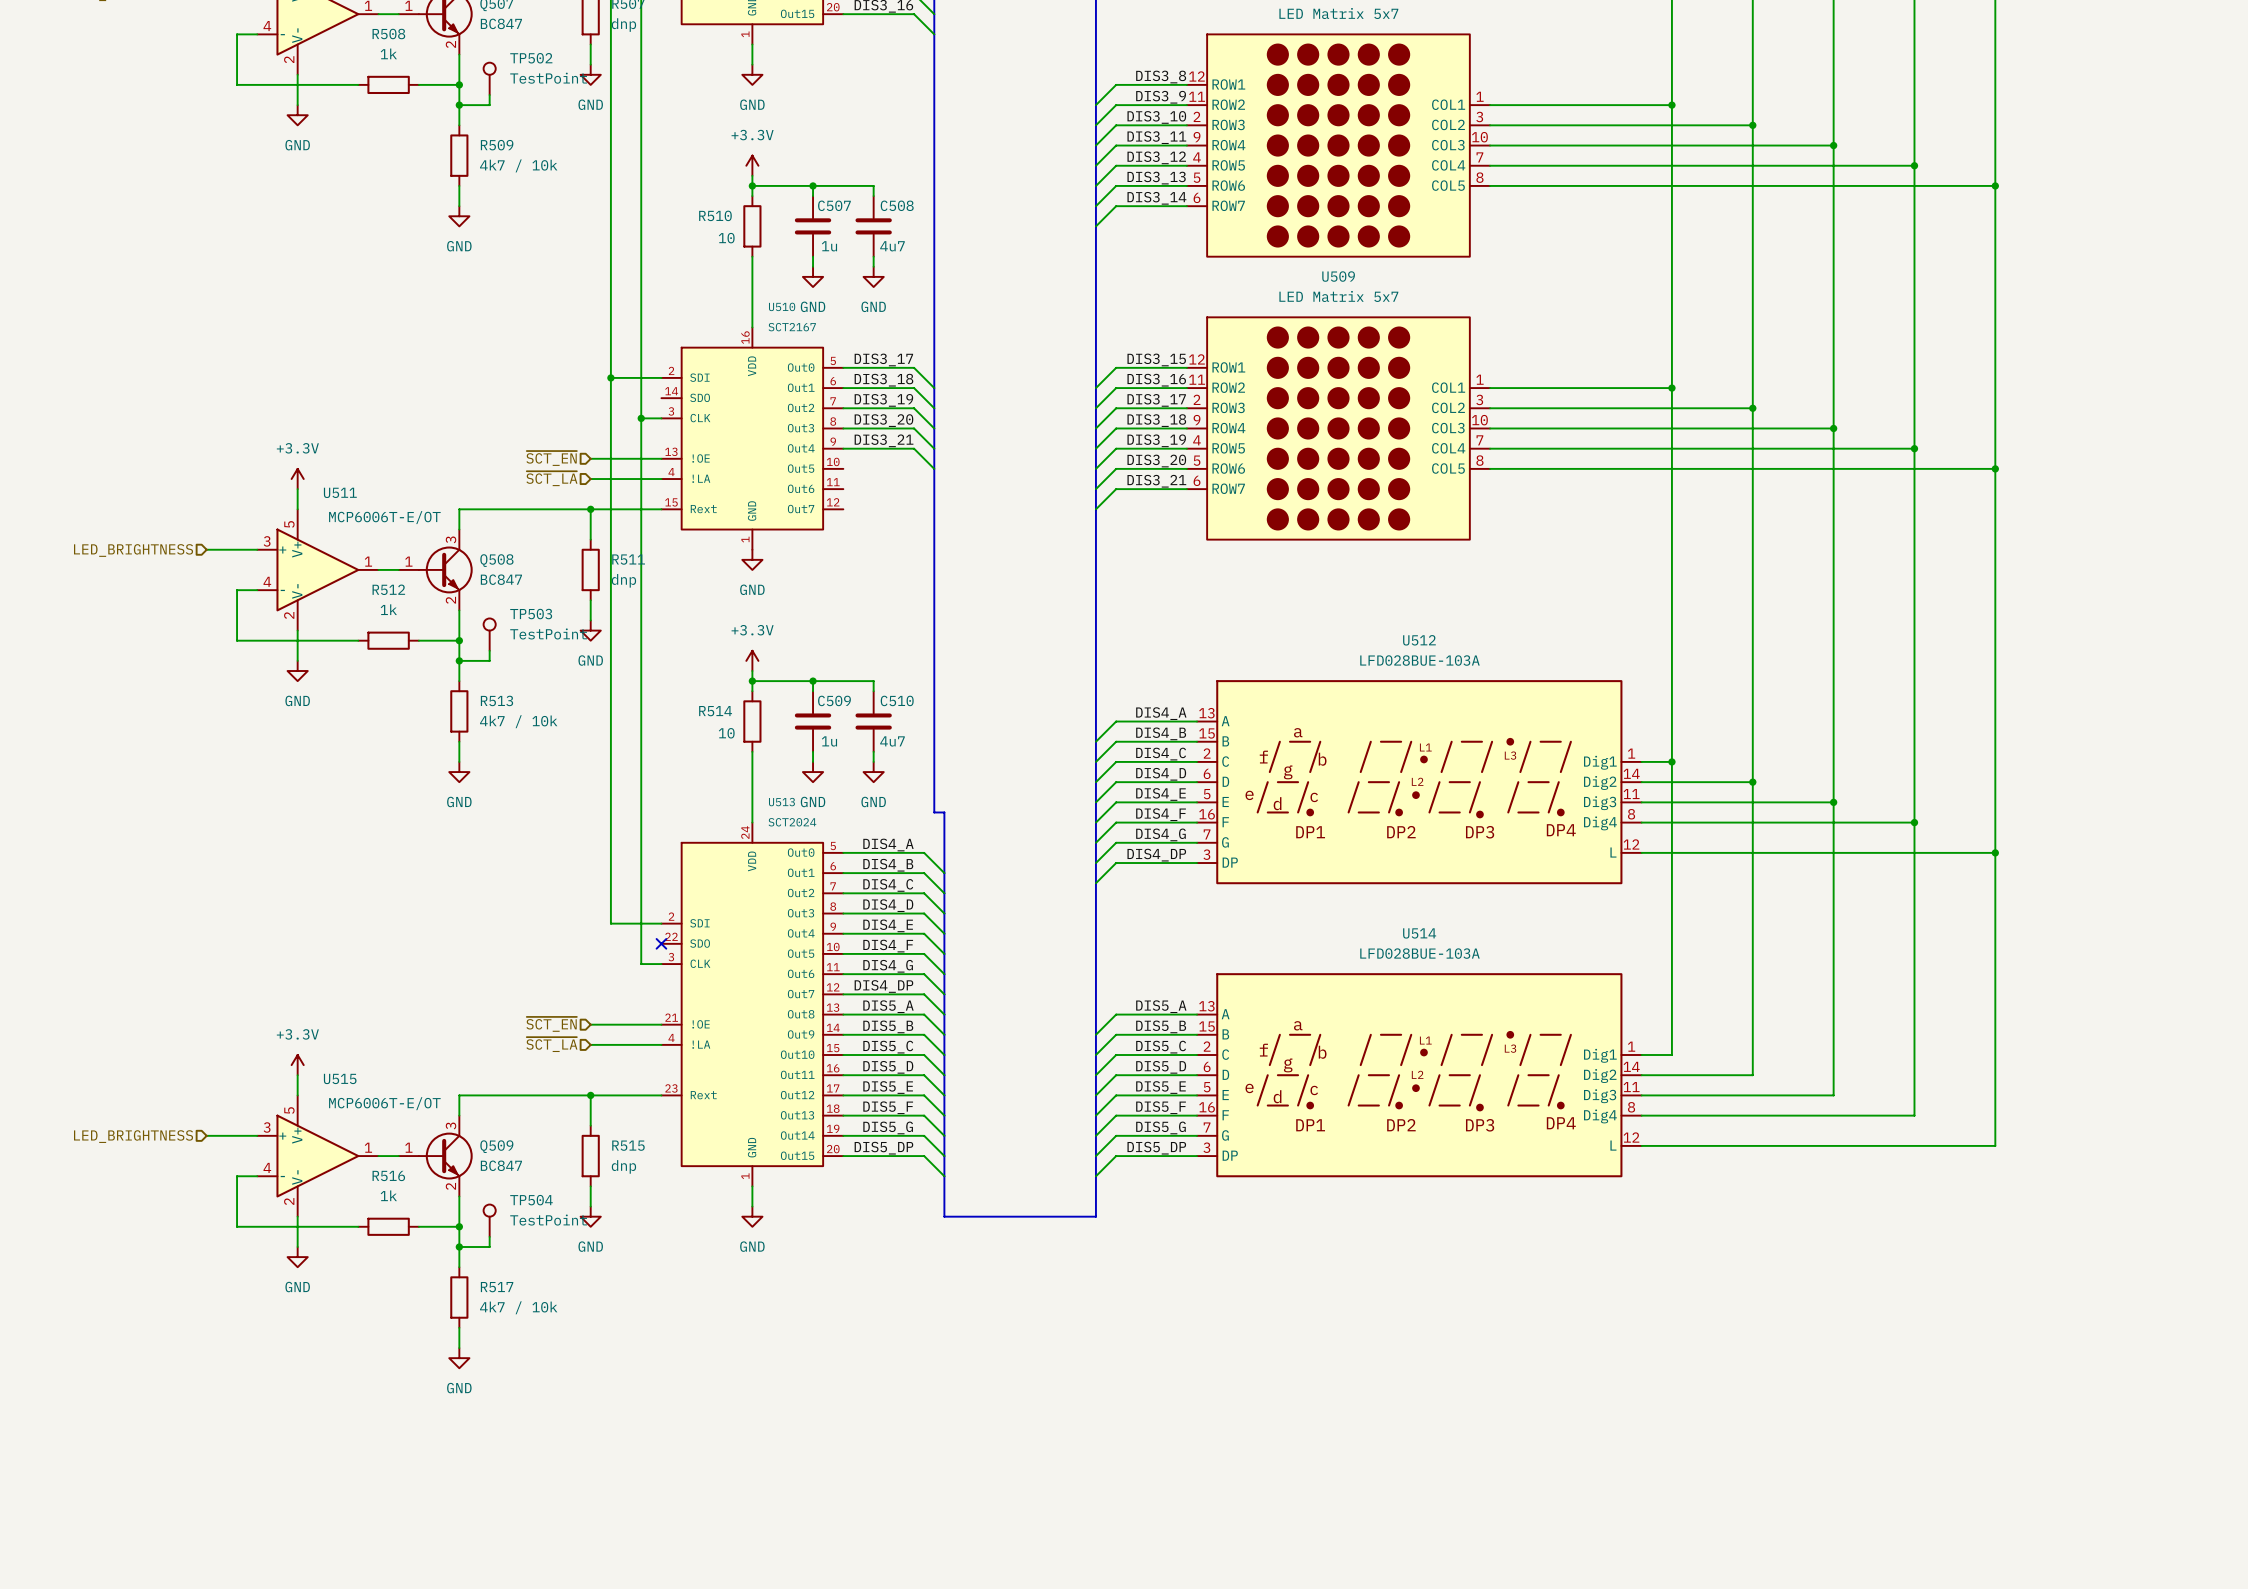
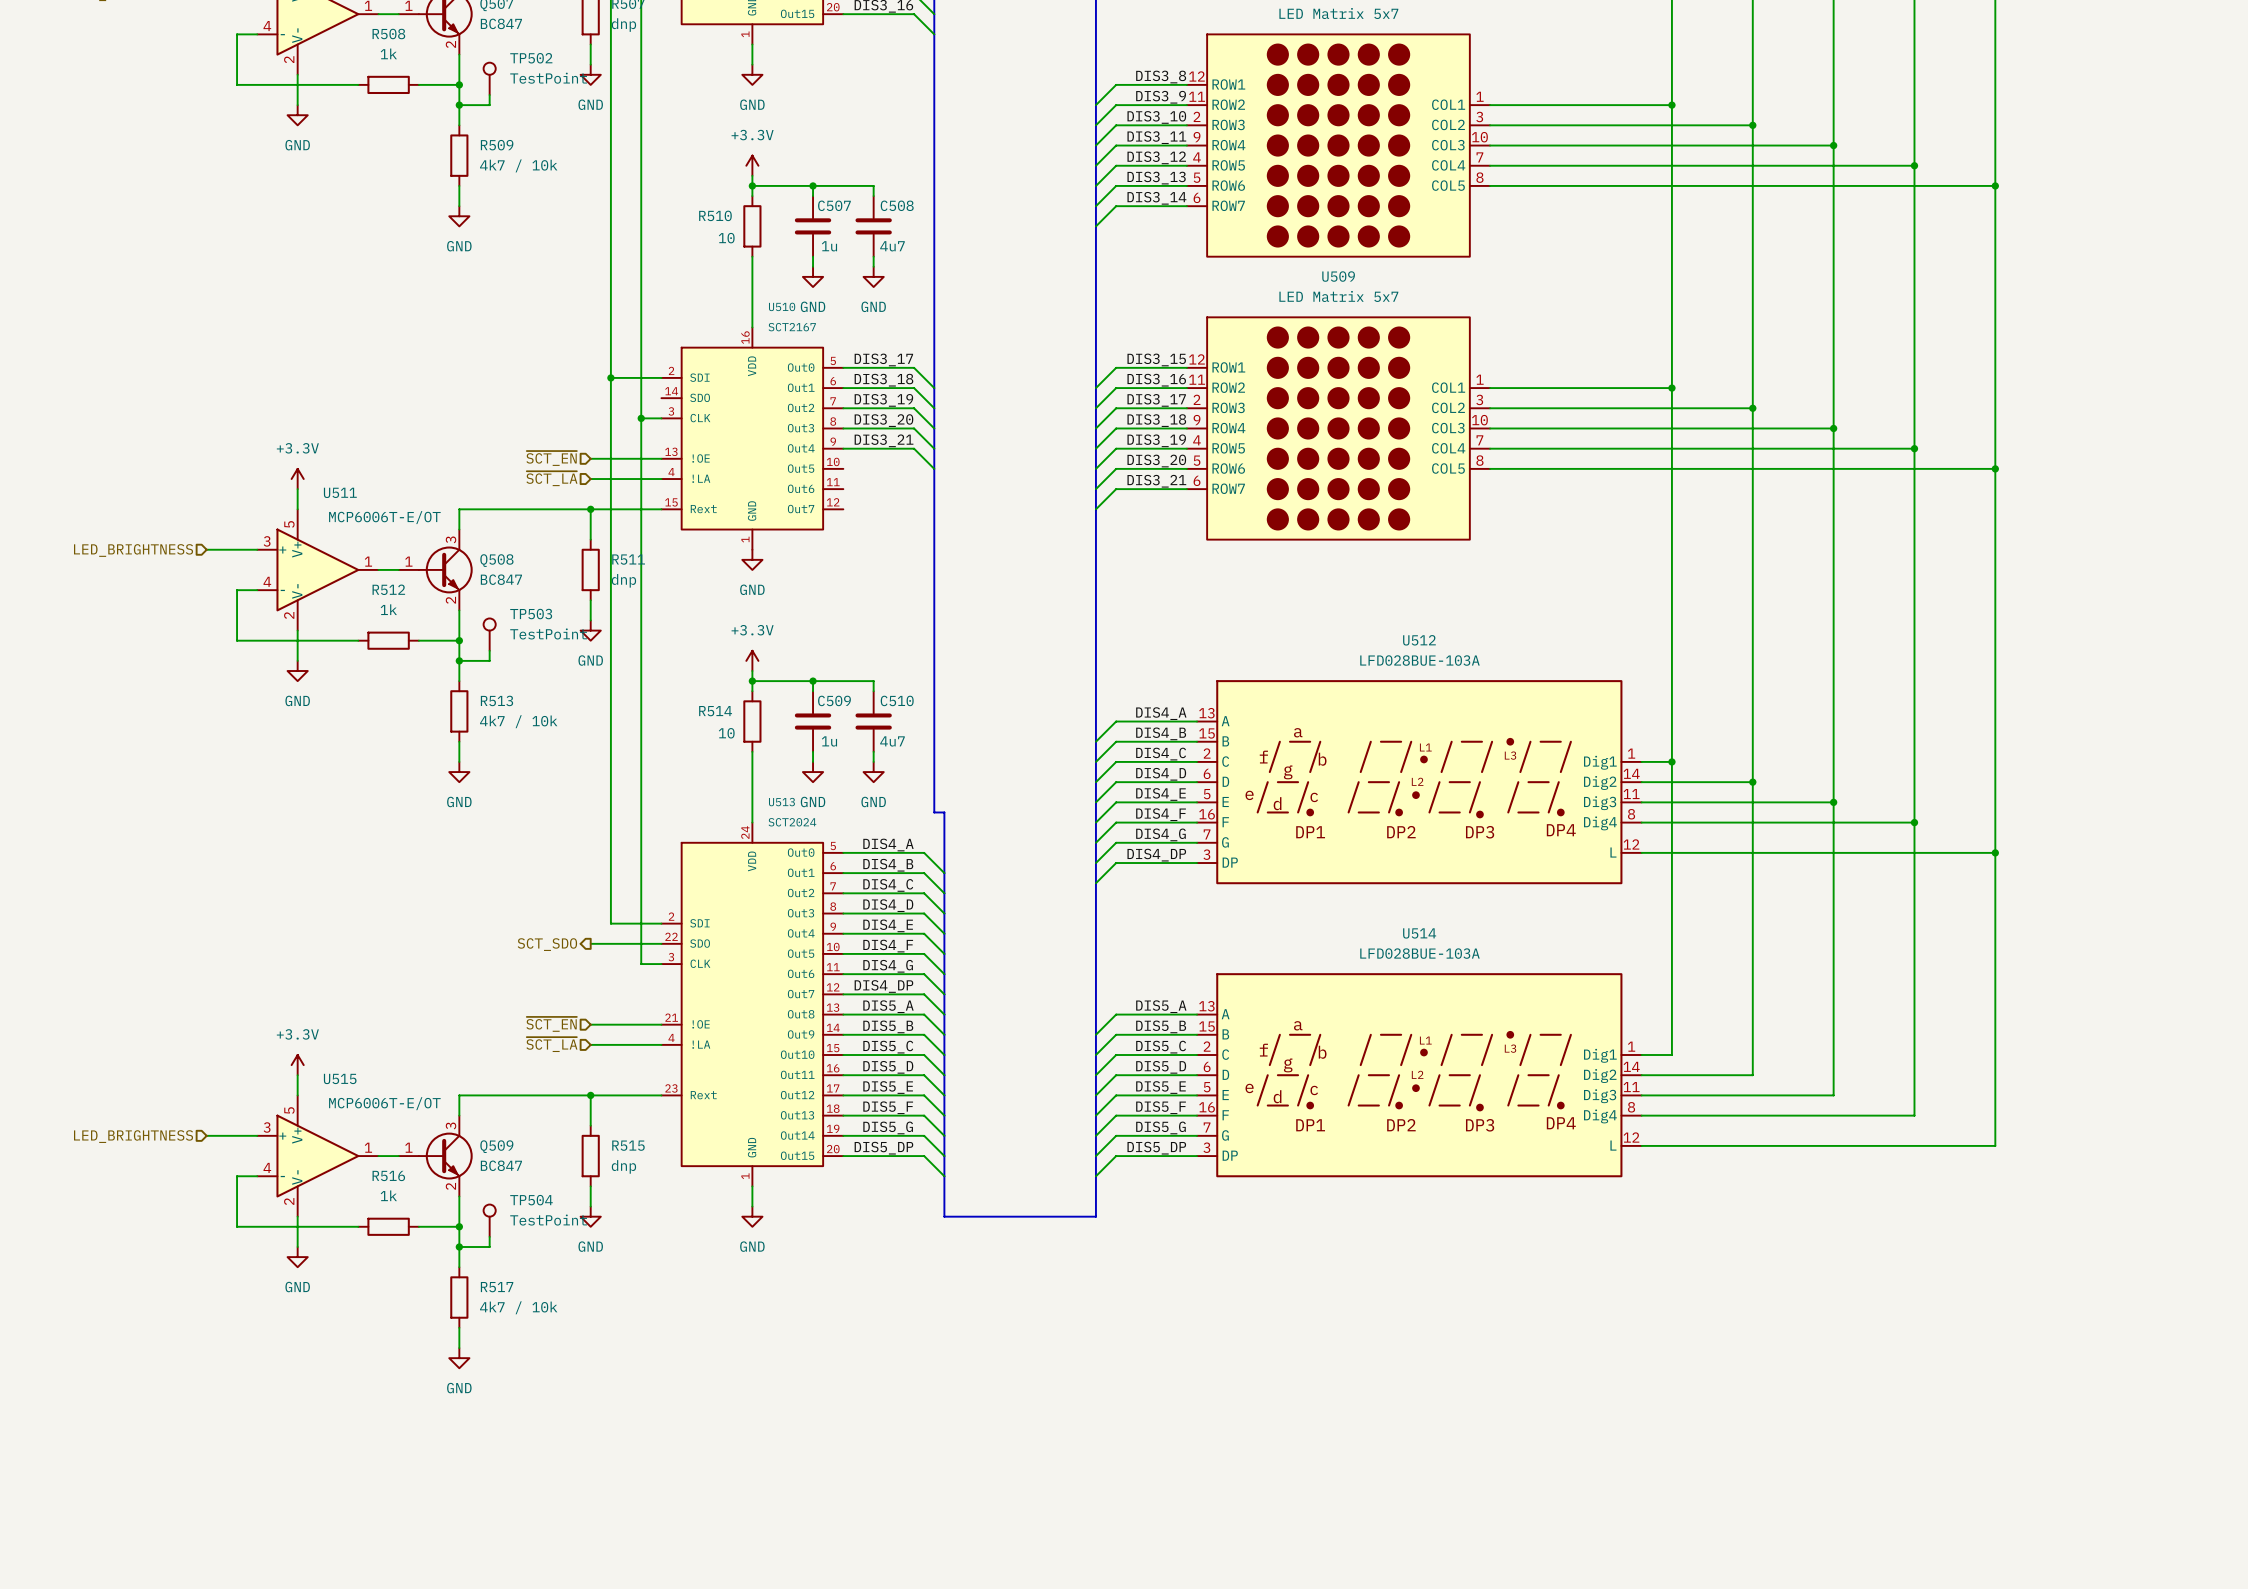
wire: none -> (590, 943) (661, 943)
no-connect mark: (661, 943) -> none
hierarchical label: none -> SCT_SDO (547, 944)

